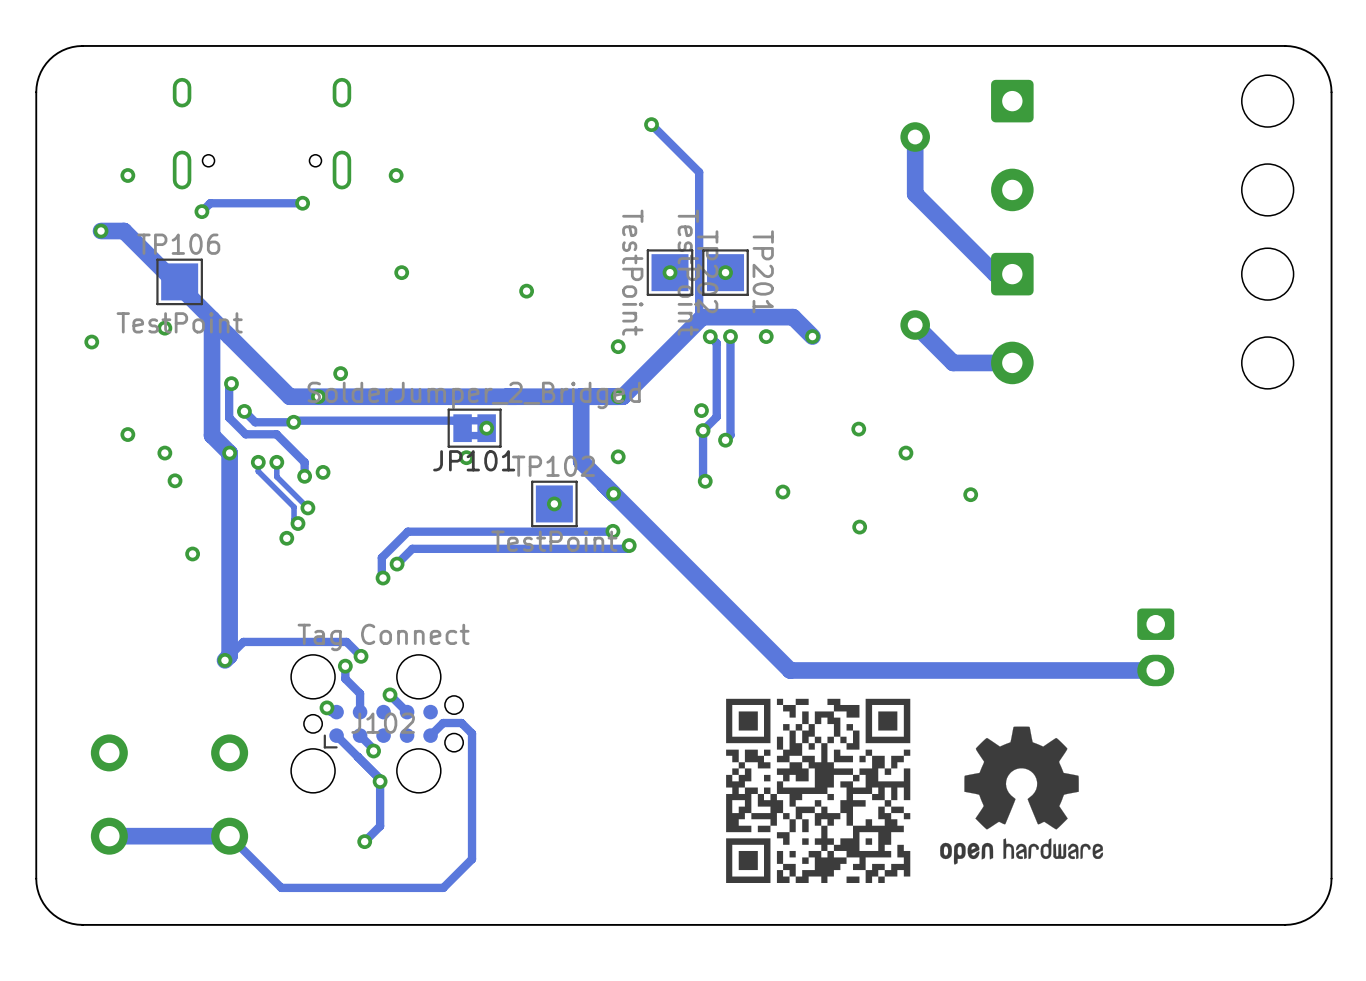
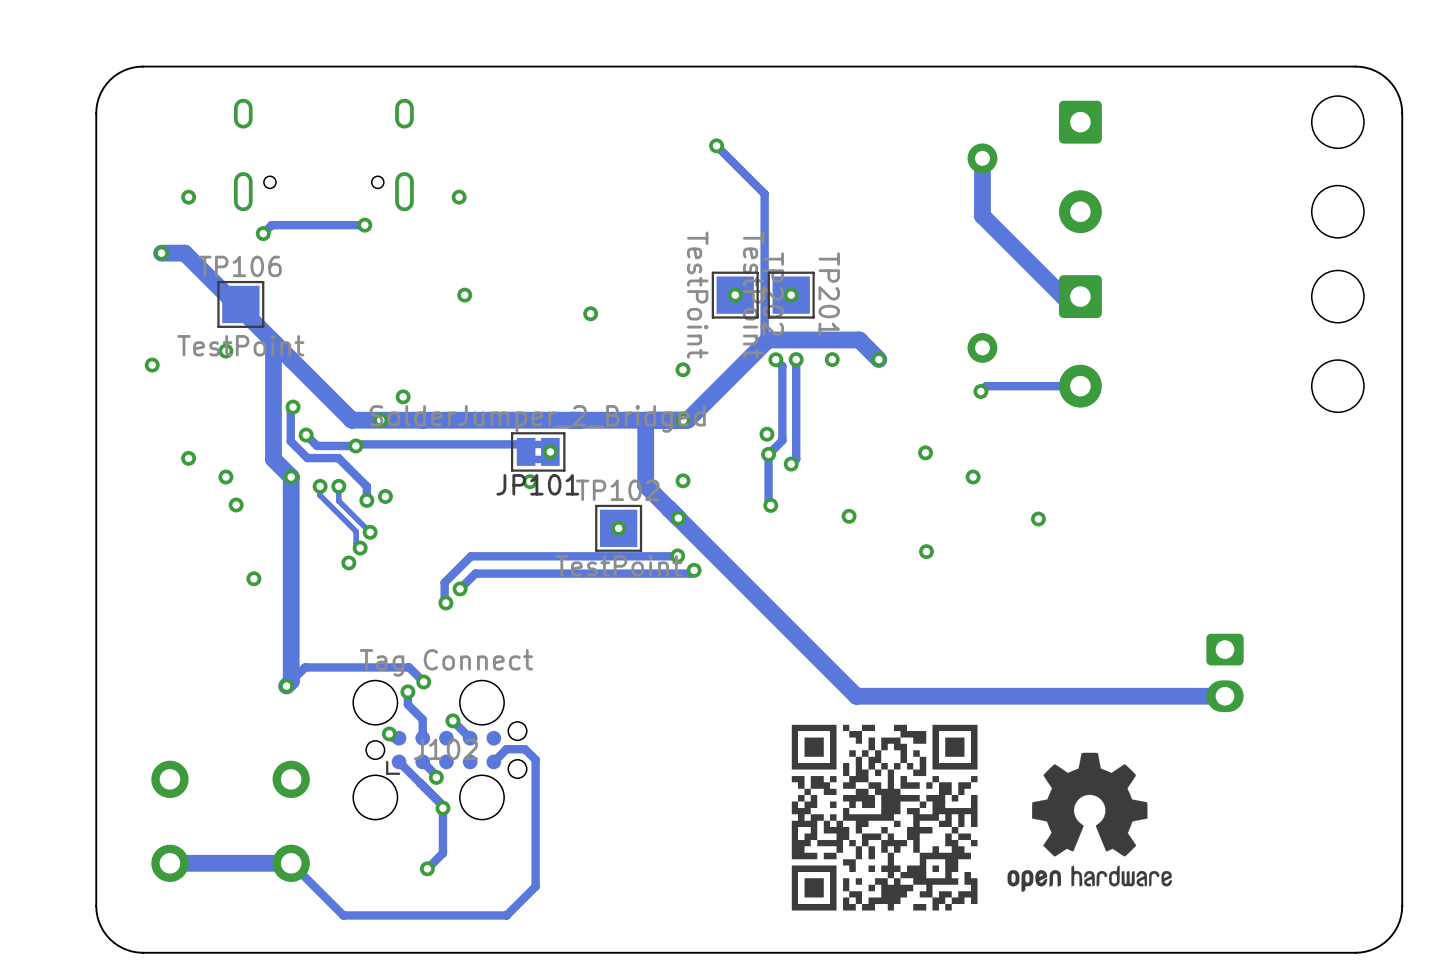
track: (915, 325) (953, 362) -> (980, 391) (986, 386) (1020, 386)
track width: thick (1012, 362) (953, 362) -> thin (1080, 386) (1020, 386)
via: none -> (980, 391)

